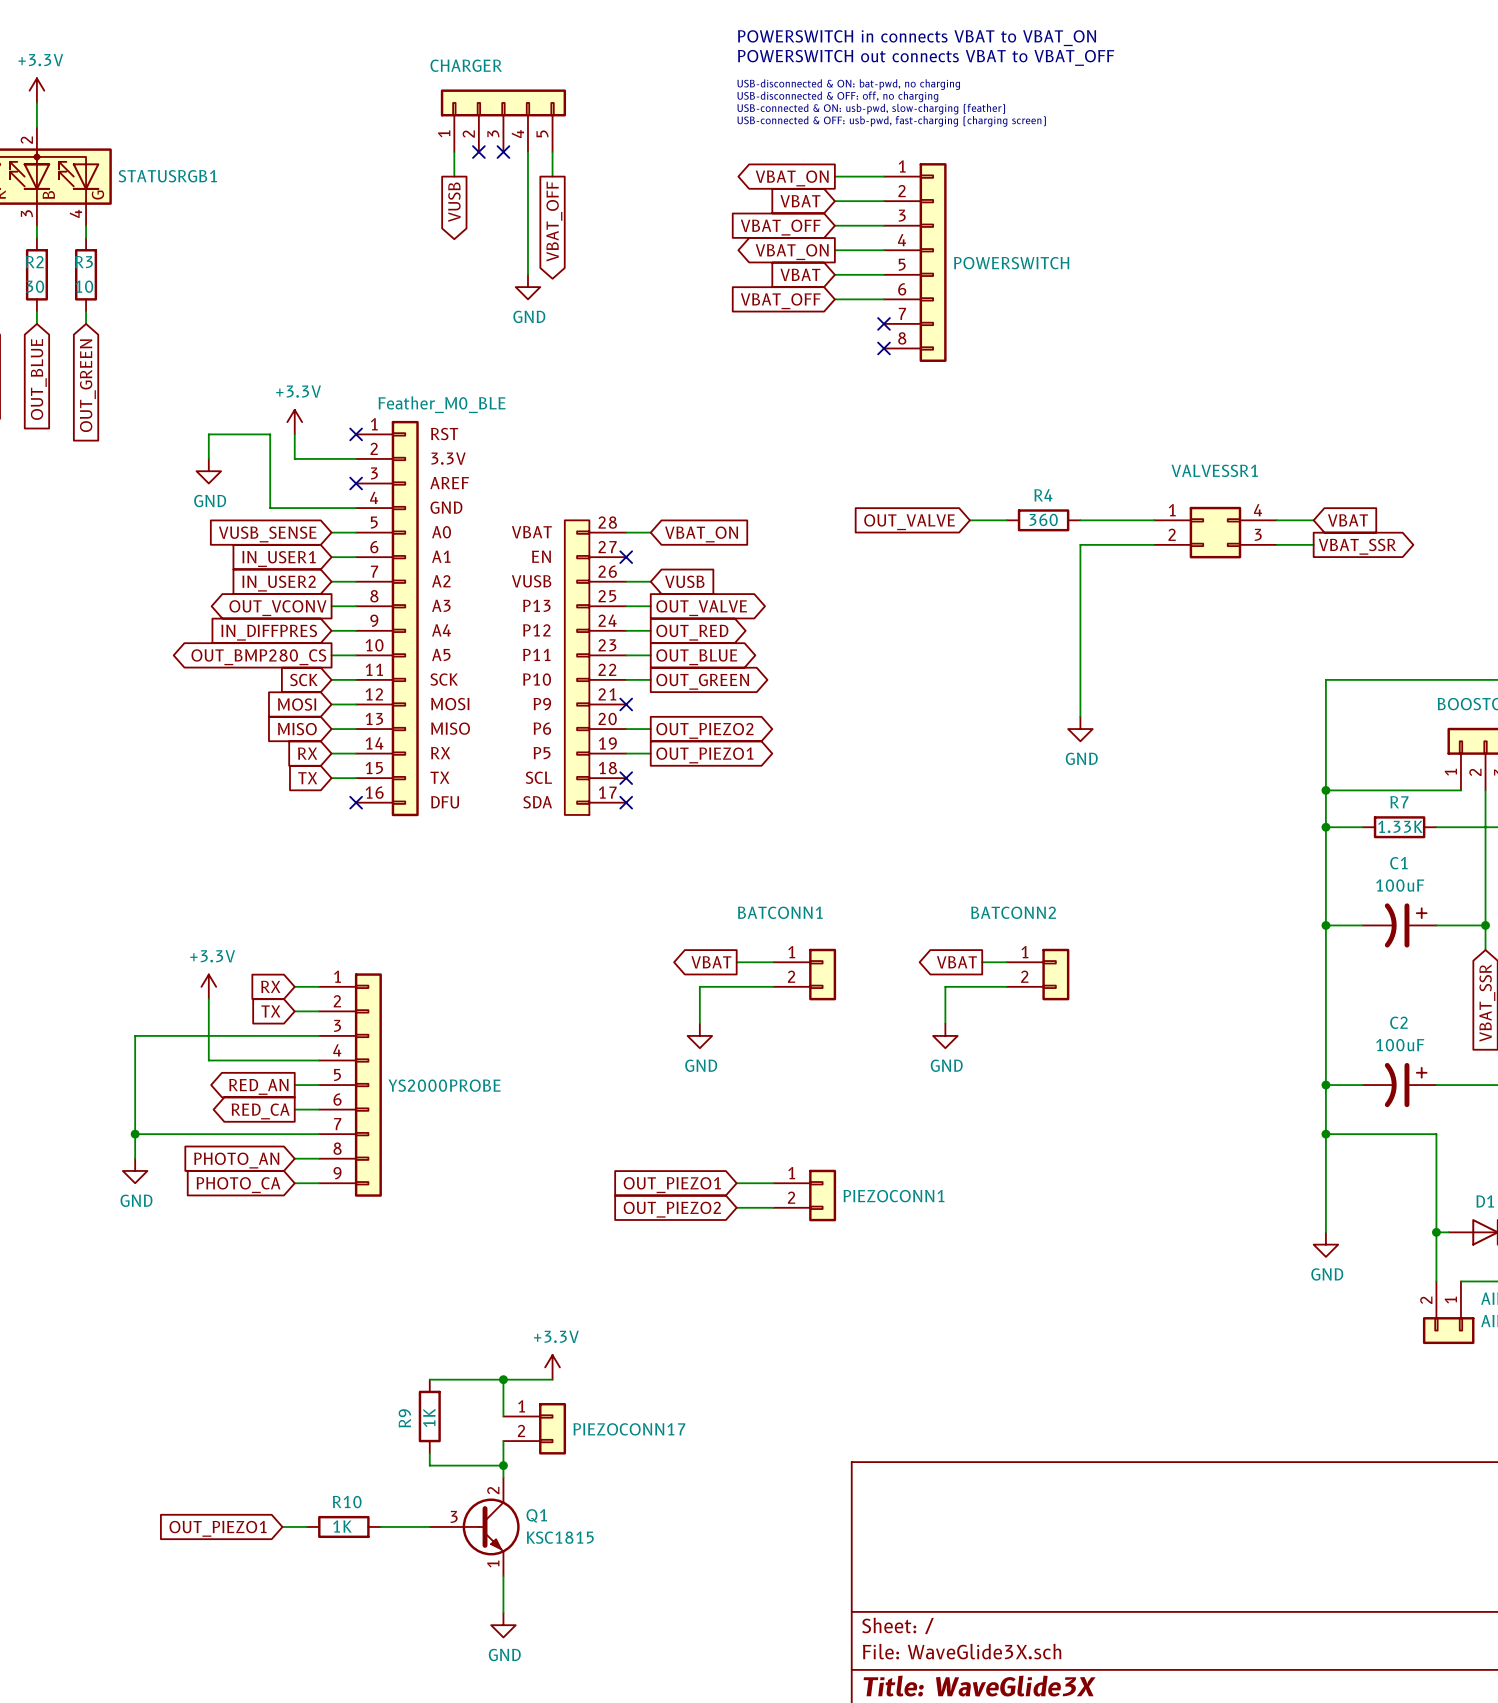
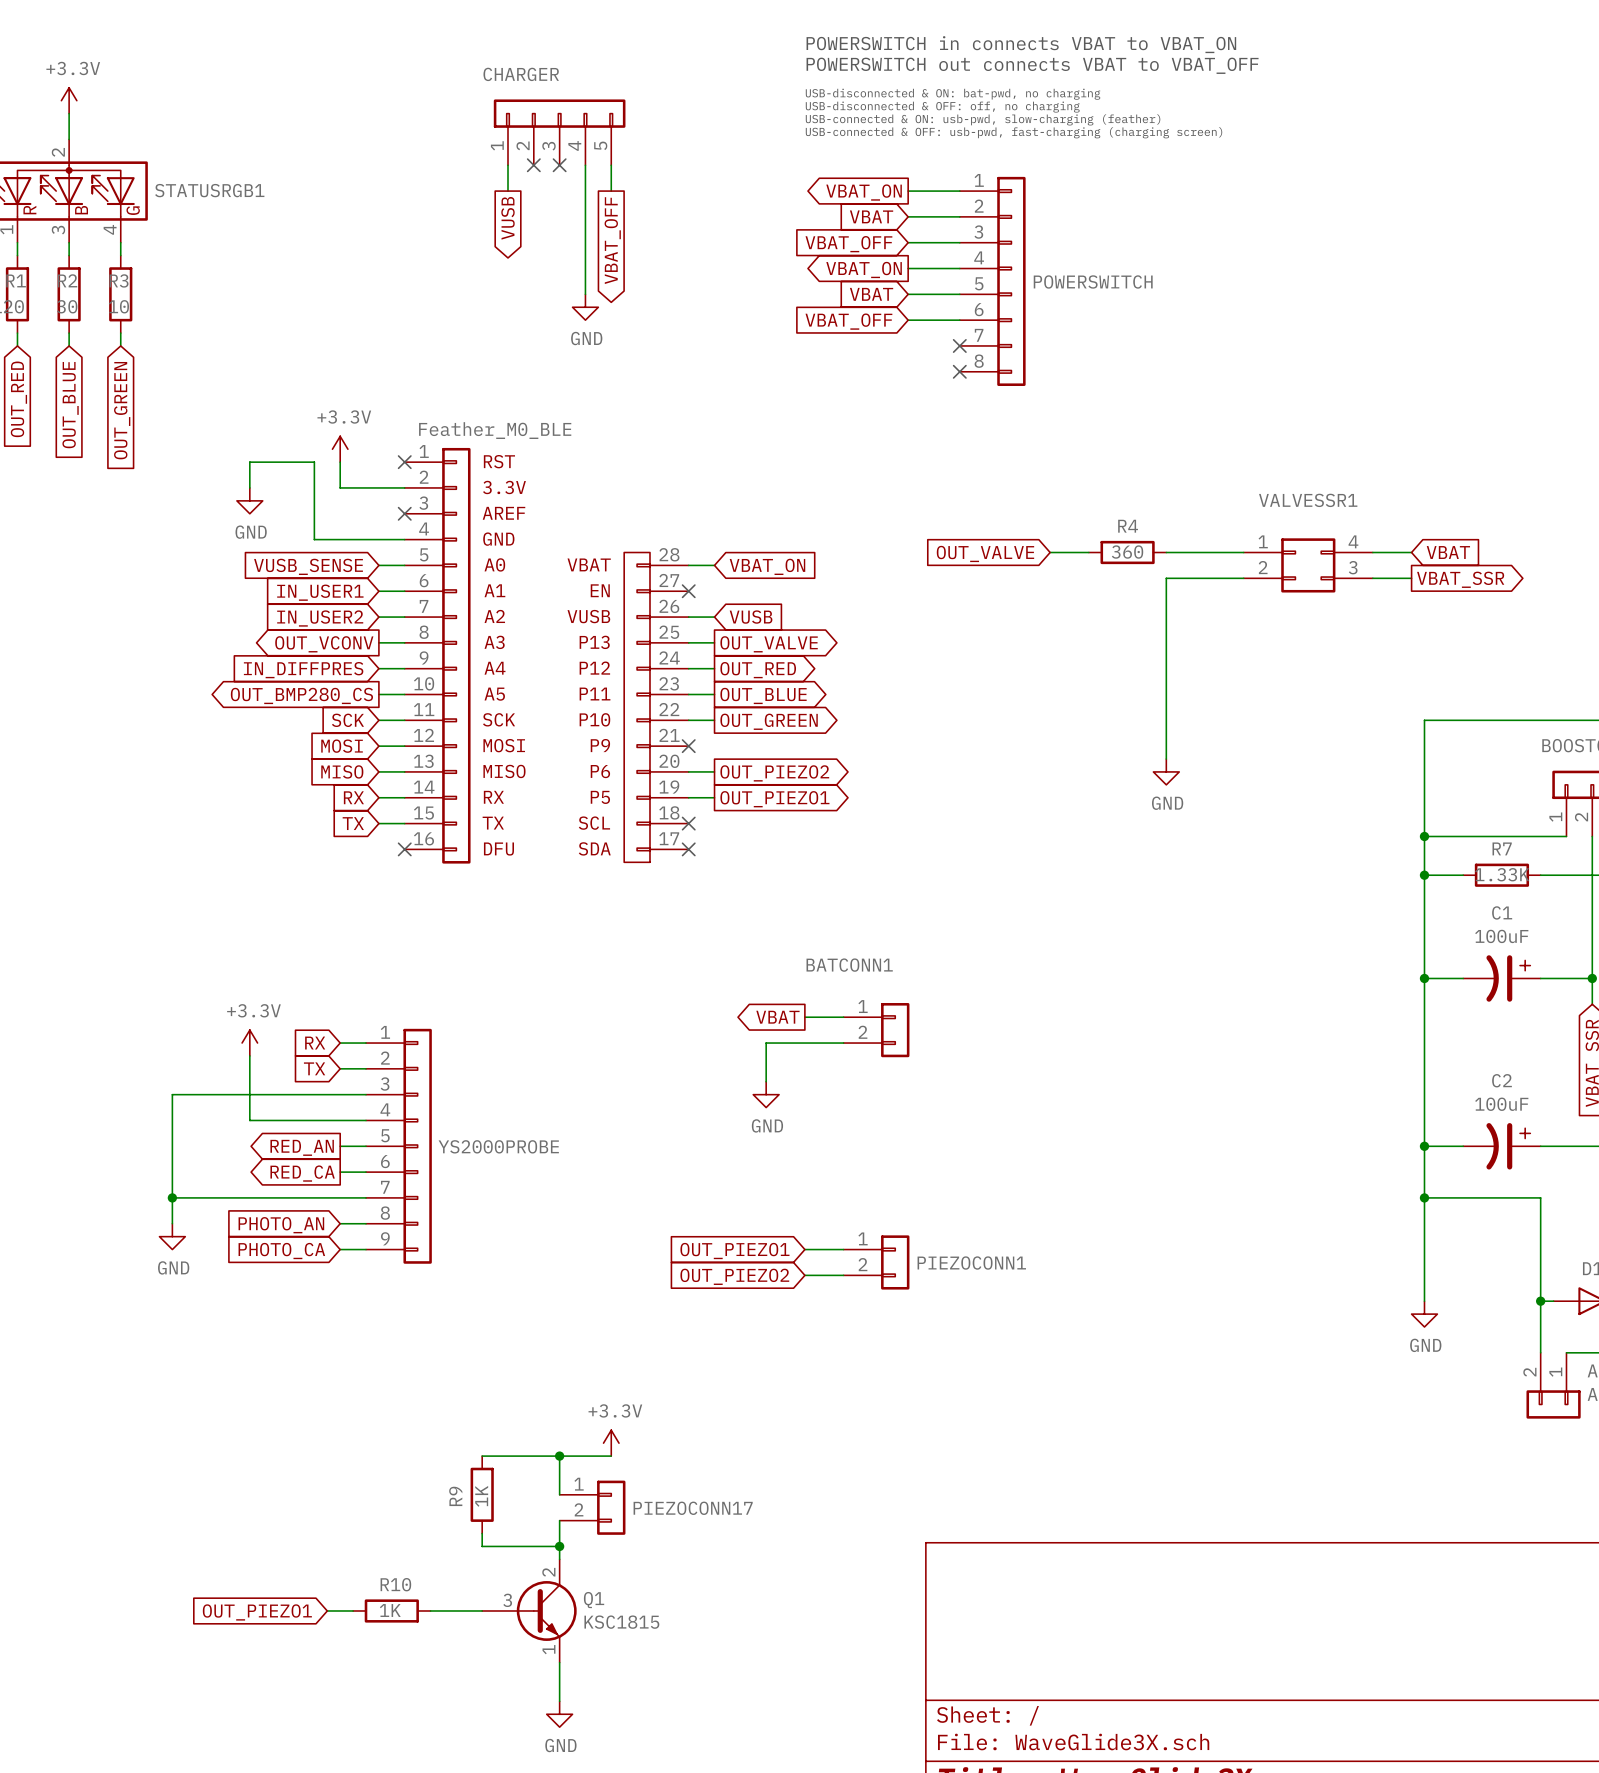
global label: VBAT (956, 962) -> none
wire: (982, 962) (1006, 962) -> none
BATCONN2: (1038, 974) -> none
wire: (1006, 986) (945, 986) (945, 1023) -> none
power symbol: GND (945, 1035) -> none

